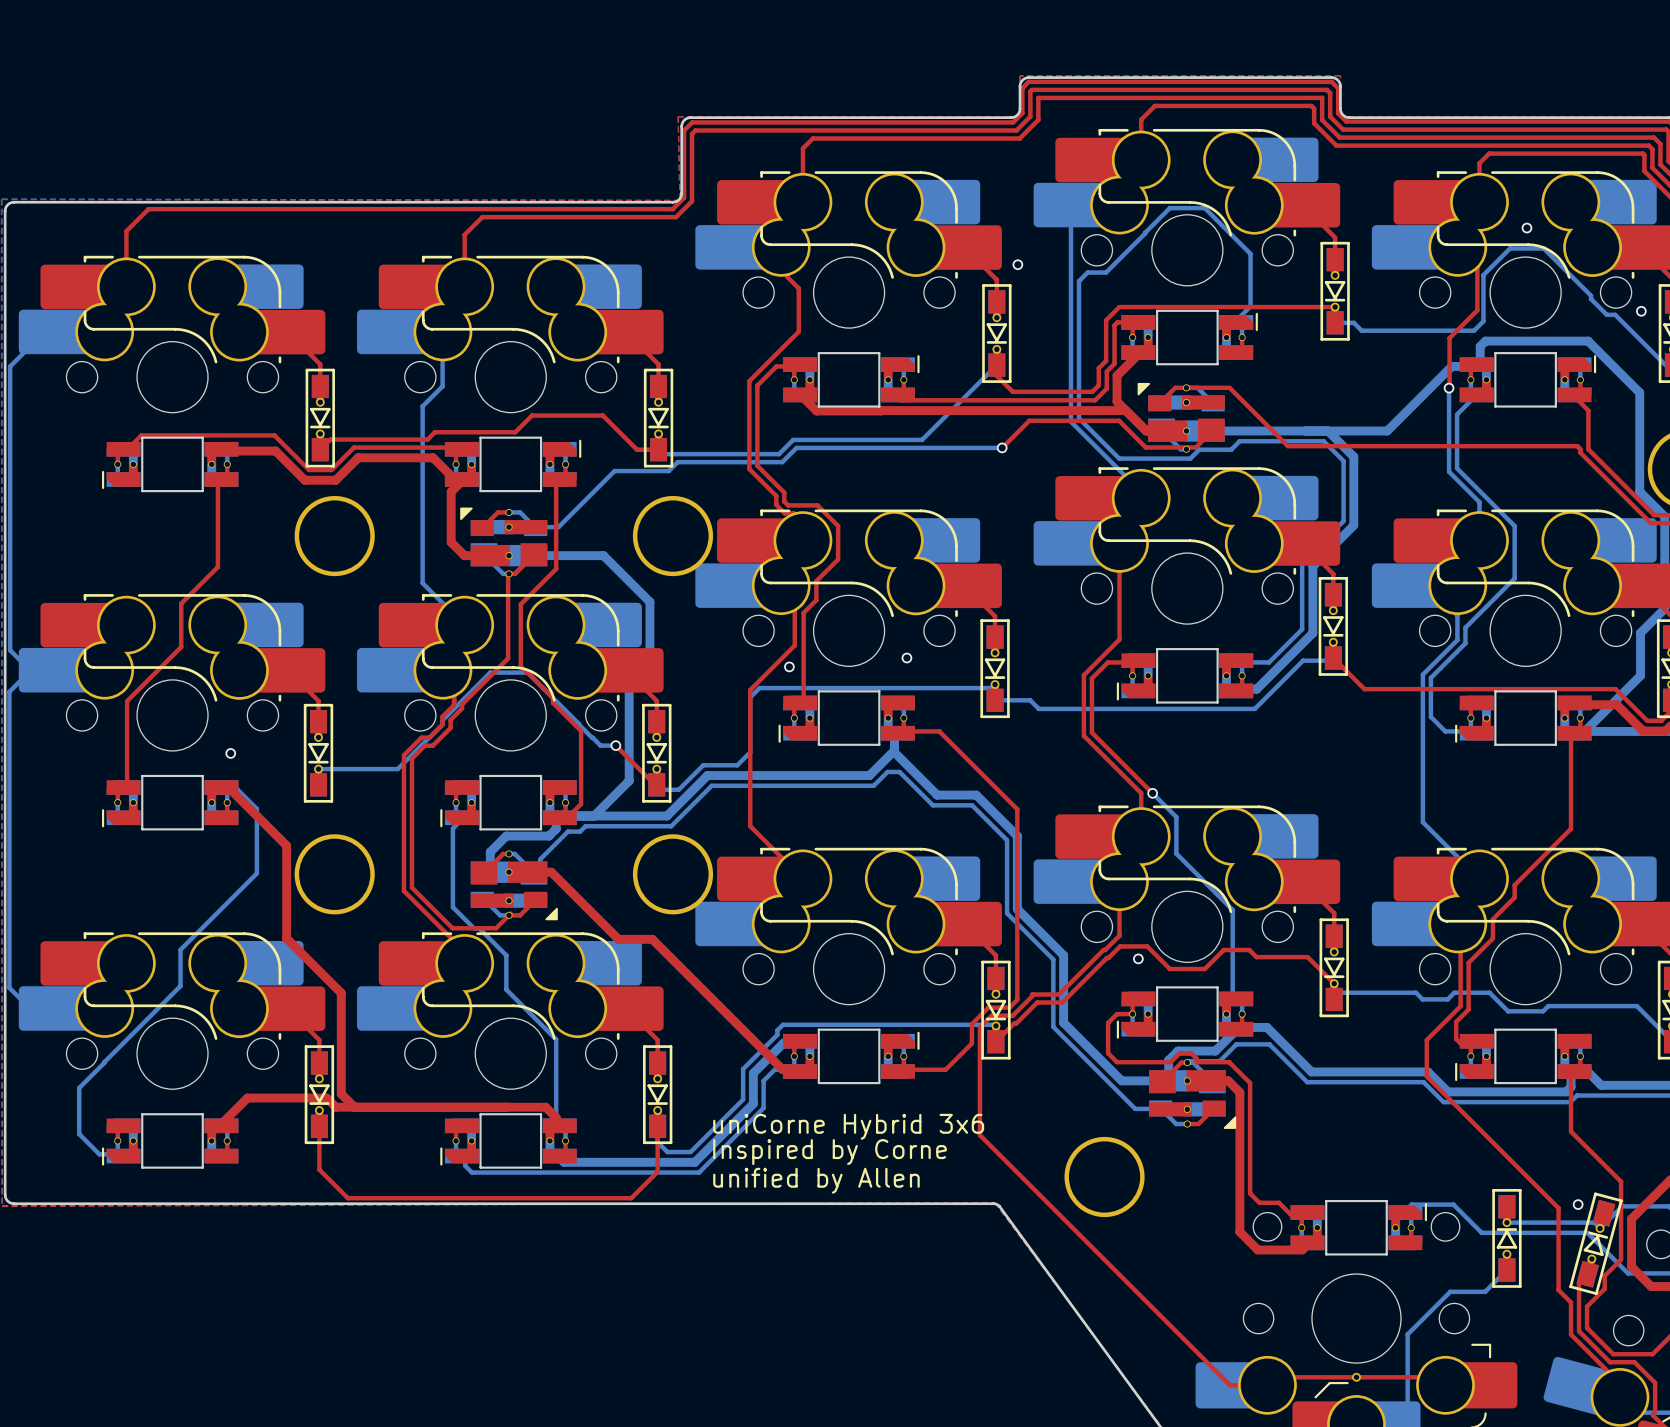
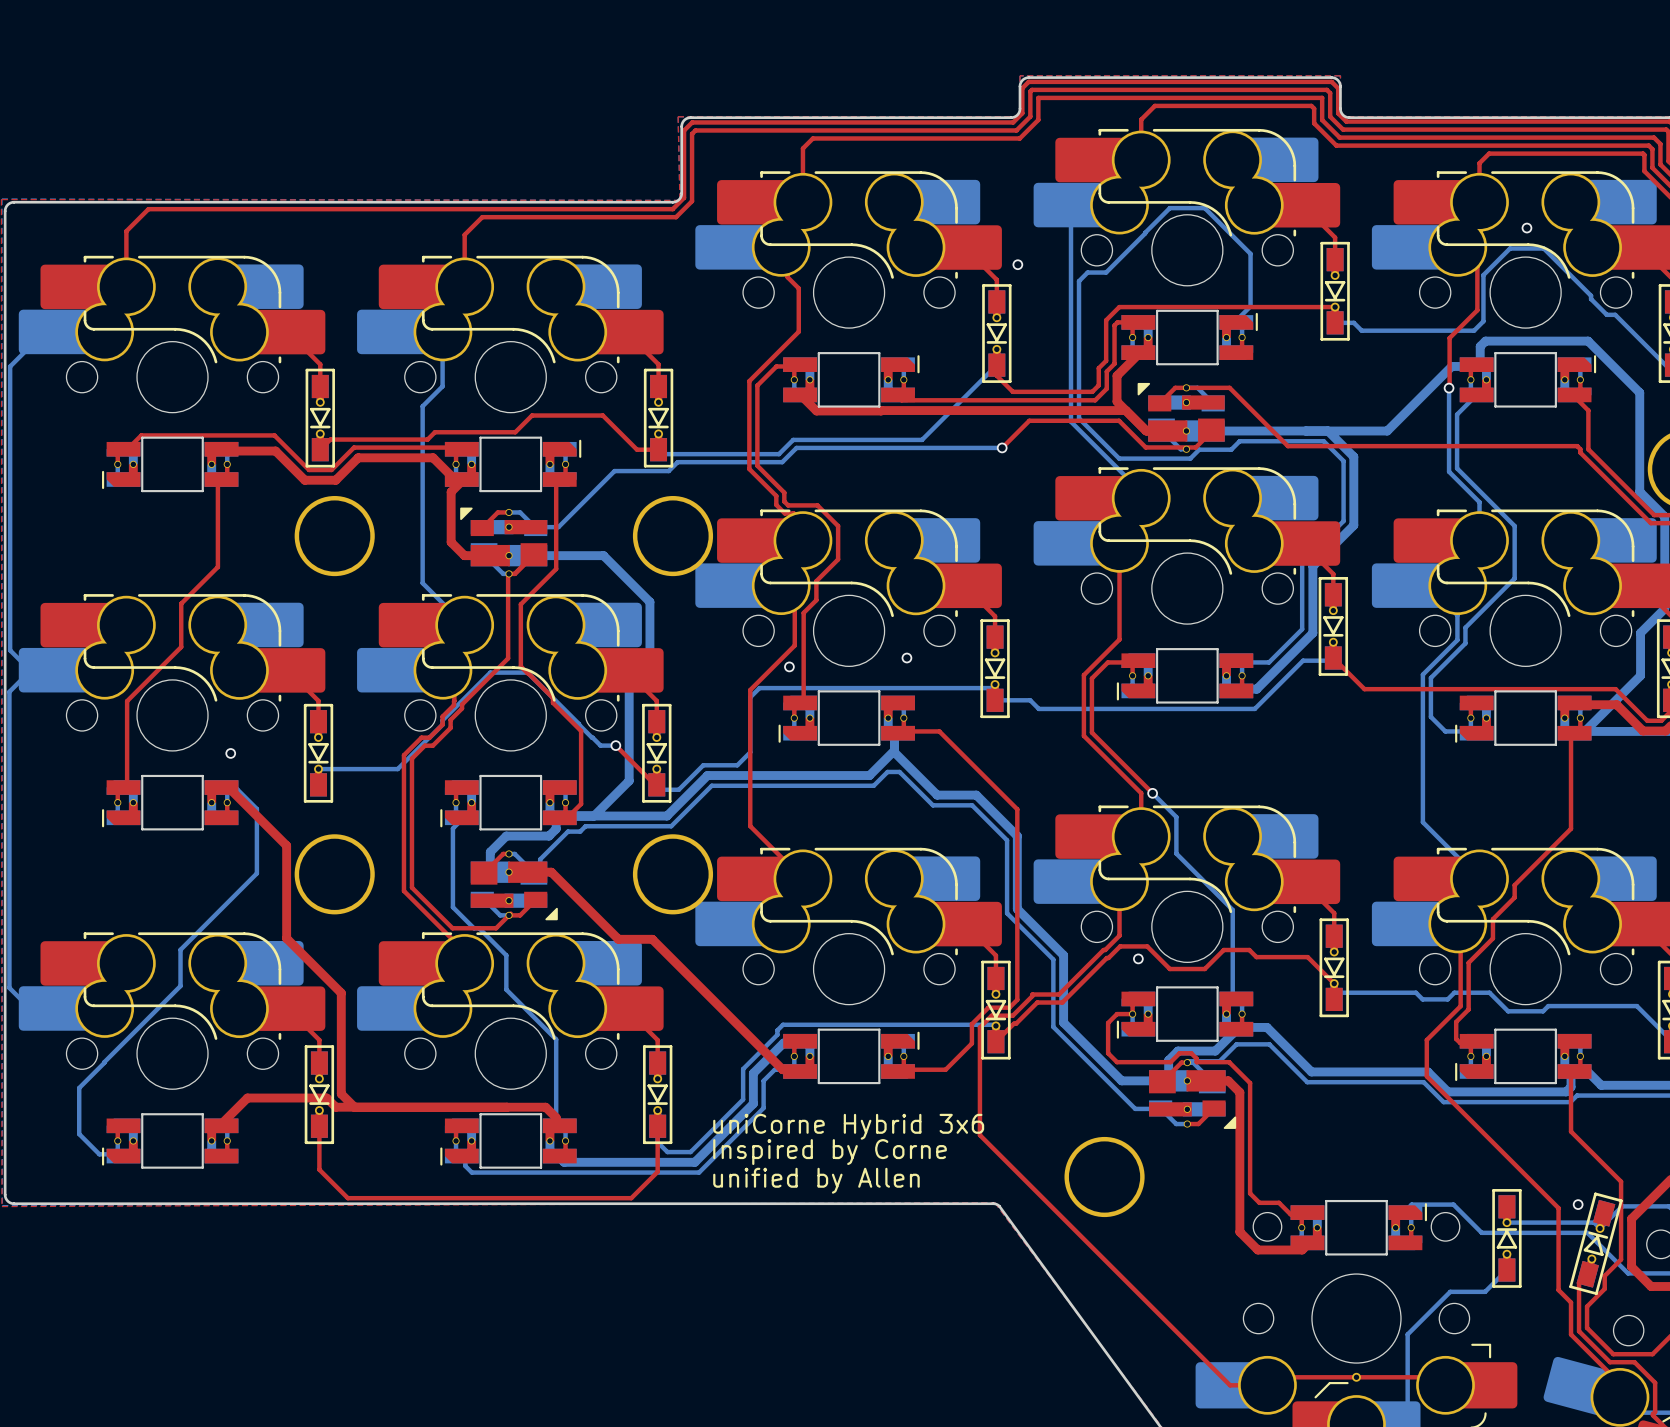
via: (1641, 311) -> none

